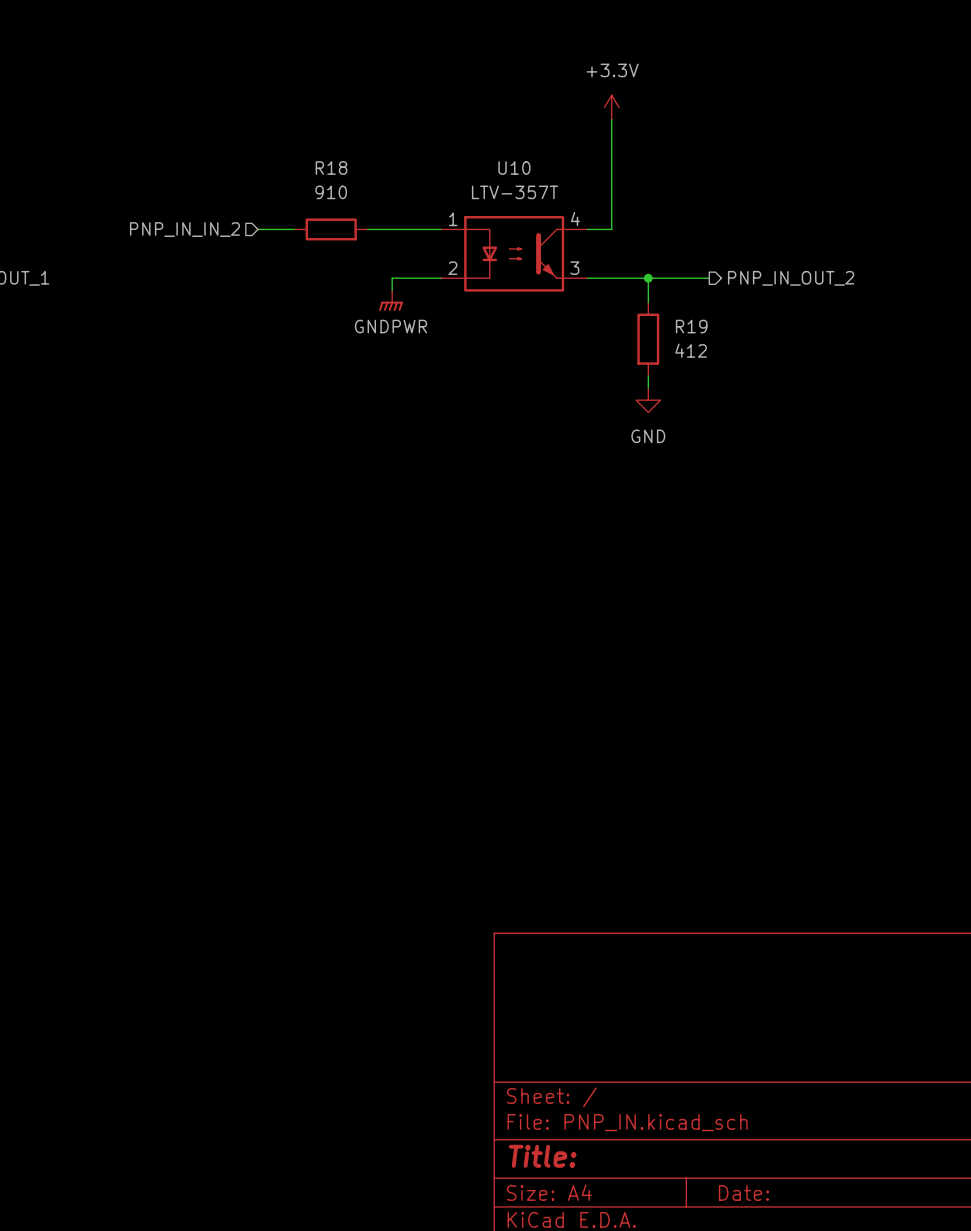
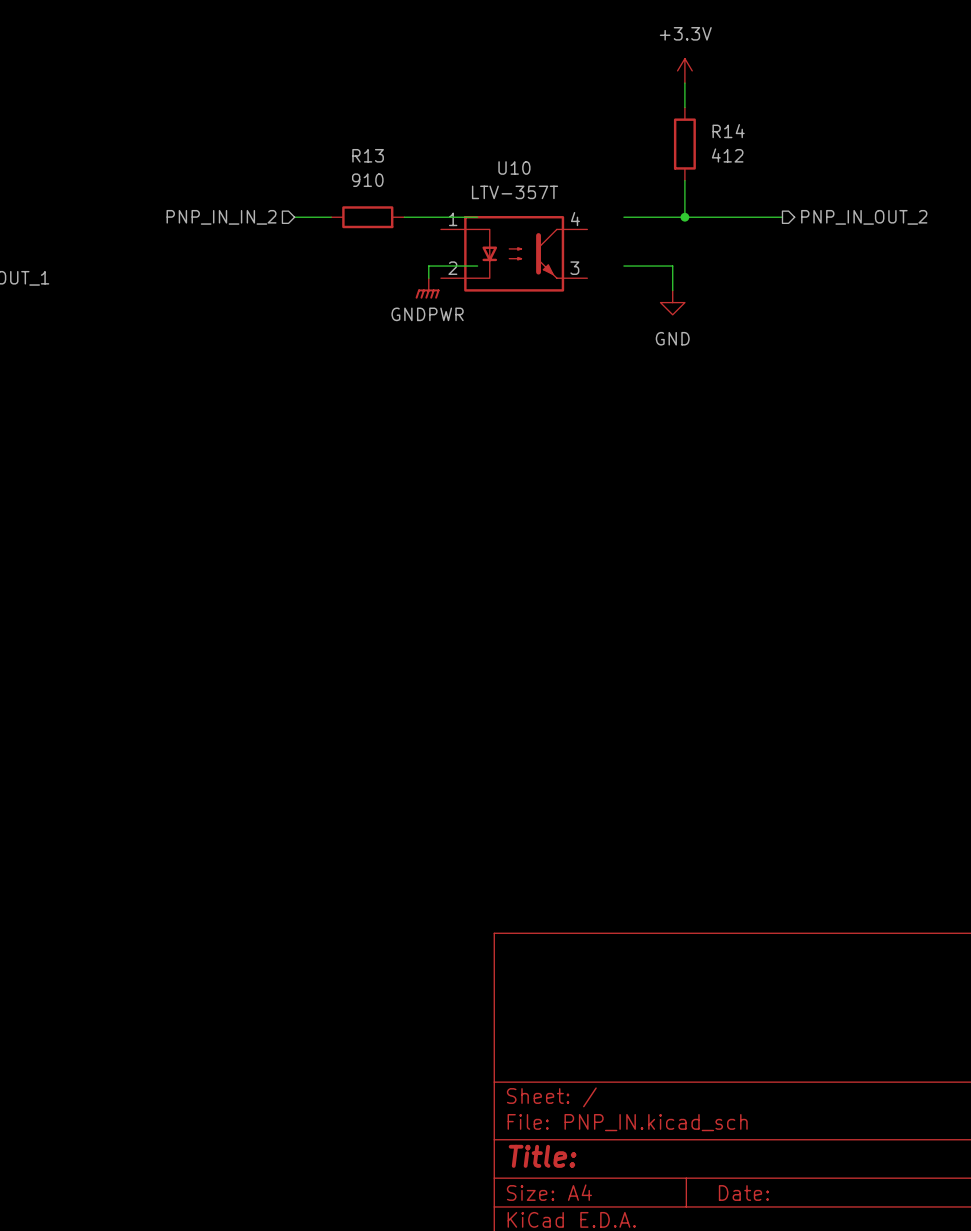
power symbol position: +3.3V (611, 107) -> +3.3V (684, 70)
wire: (611, 119) (611, 229) (587, 229) -> none
R14: none -> 412 (684, 144)
wire: none -> (684, 180) (684, 217)
R13: none -> 910 (367, 217)
wire: none -> (623, 217) (782, 217)
junction: none -> (684, 217)
hierarchical label position: PNP_IN_IN_2 (184, 229) -> PNP_IN_IN_2 (221, 217)
wire: (258, 229) (294, 229) -> (294, 217) (331, 217)
R18: 910 (331, 229) -> none
wire: (367, 229) (440, 229) -> (404, 217) (477, 217)
wire: none -> (623, 266) (672, 266) (672, 290)
wire: (440, 278) (392, 278) (392, 290) -> (477, 266) (428, 266) (428, 278)
wire: (587, 278) (709, 278) -> none
wire: (648, 278) (648, 302) -> (684, 83) (684, 107)
junction: (648, 278) -> none
hierarchical label position: PNP_IN_OUT_2 (791, 278) -> PNP_IN_OUT_2 (864, 217)
power symbol position: GNDPWR (390, 300) -> GNDPWR (427, 288)
R19: 412 (648, 339) -> none
wire: (648, 375) (648, 387) -> none
power symbol position: GND (648, 400) -> GND (672, 302)

